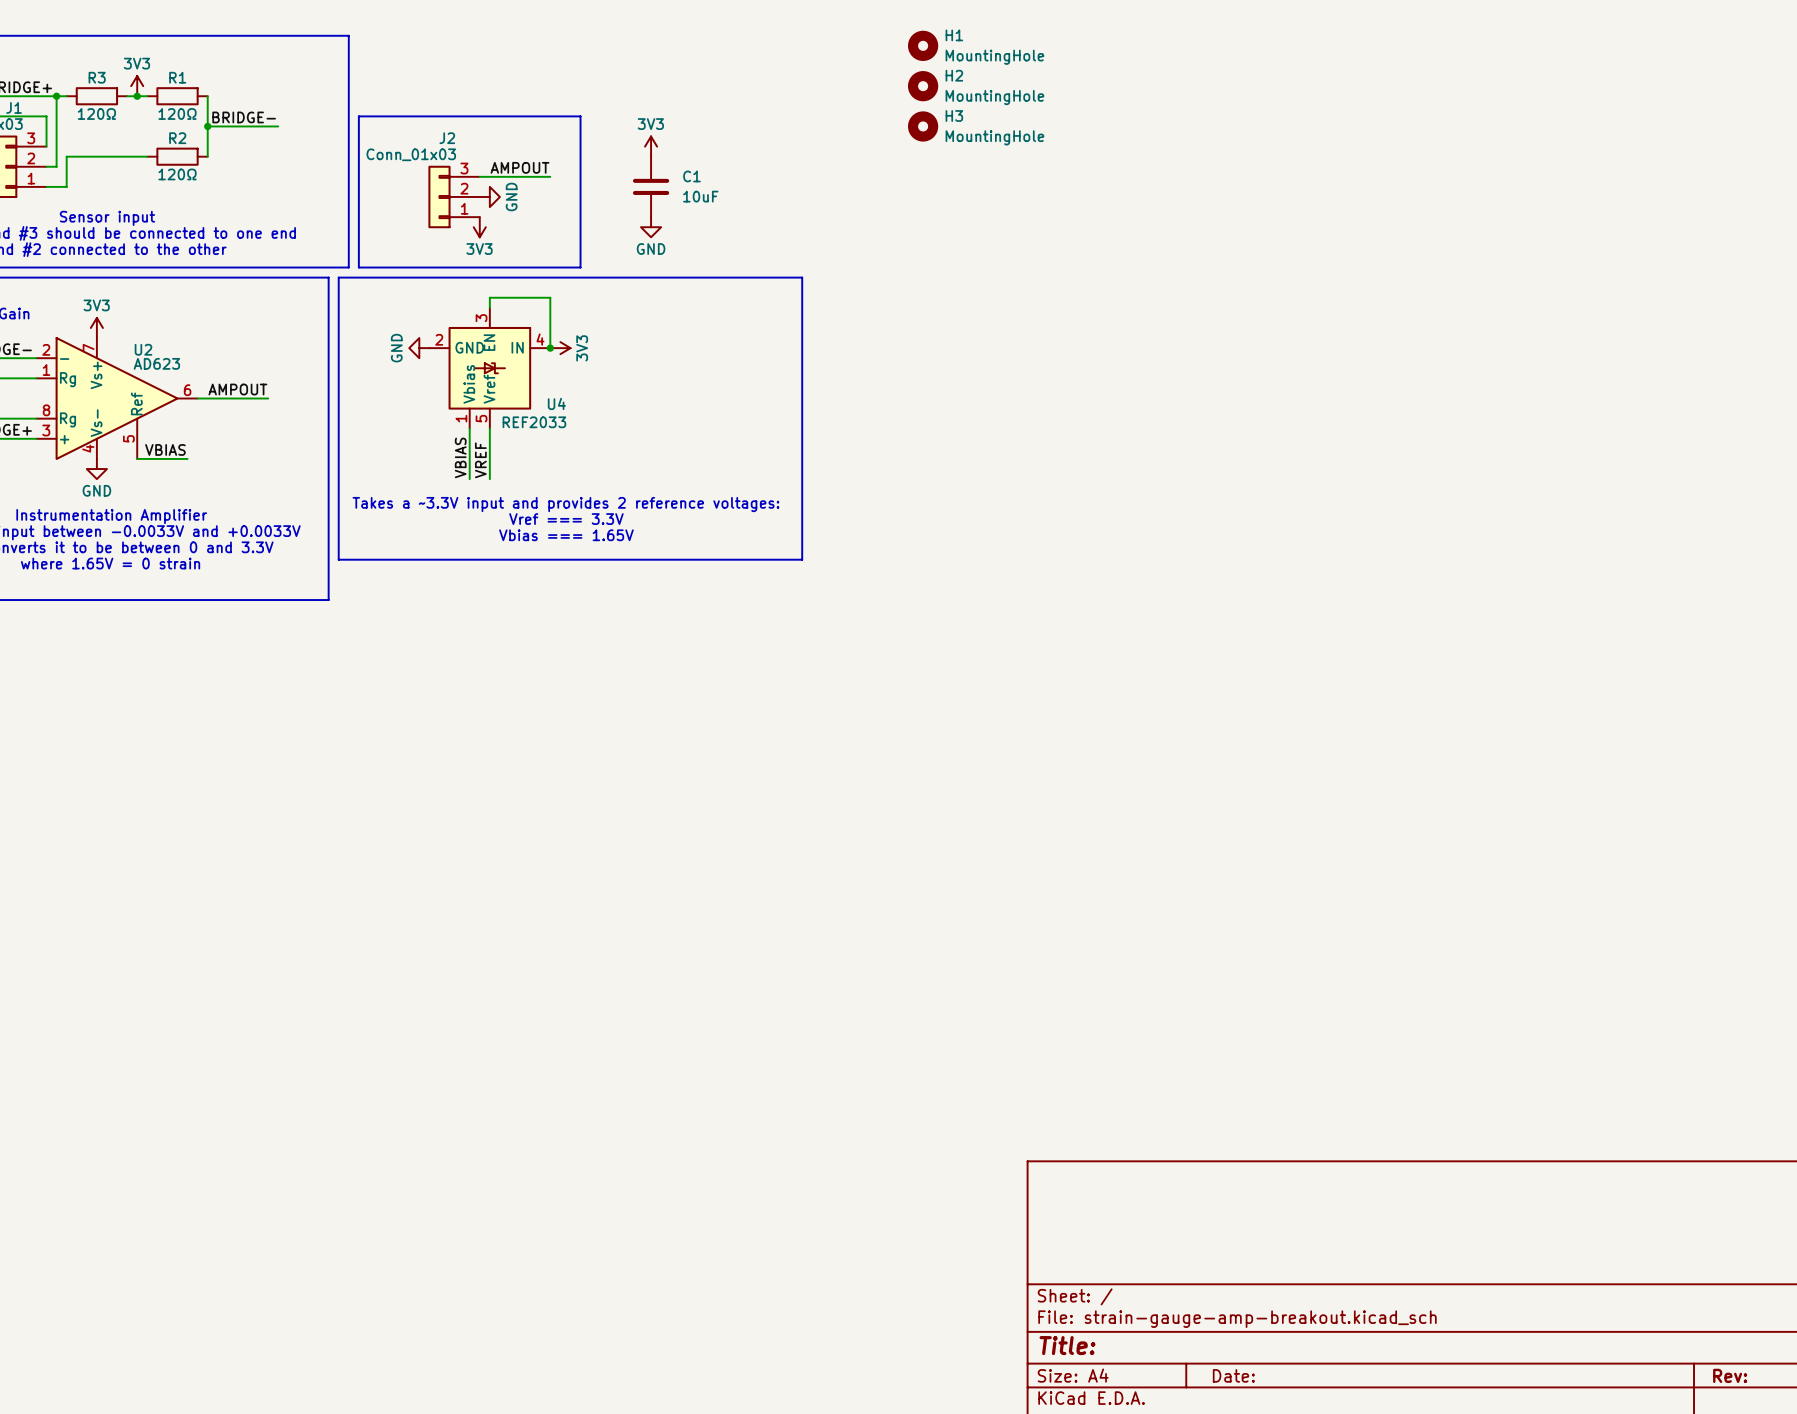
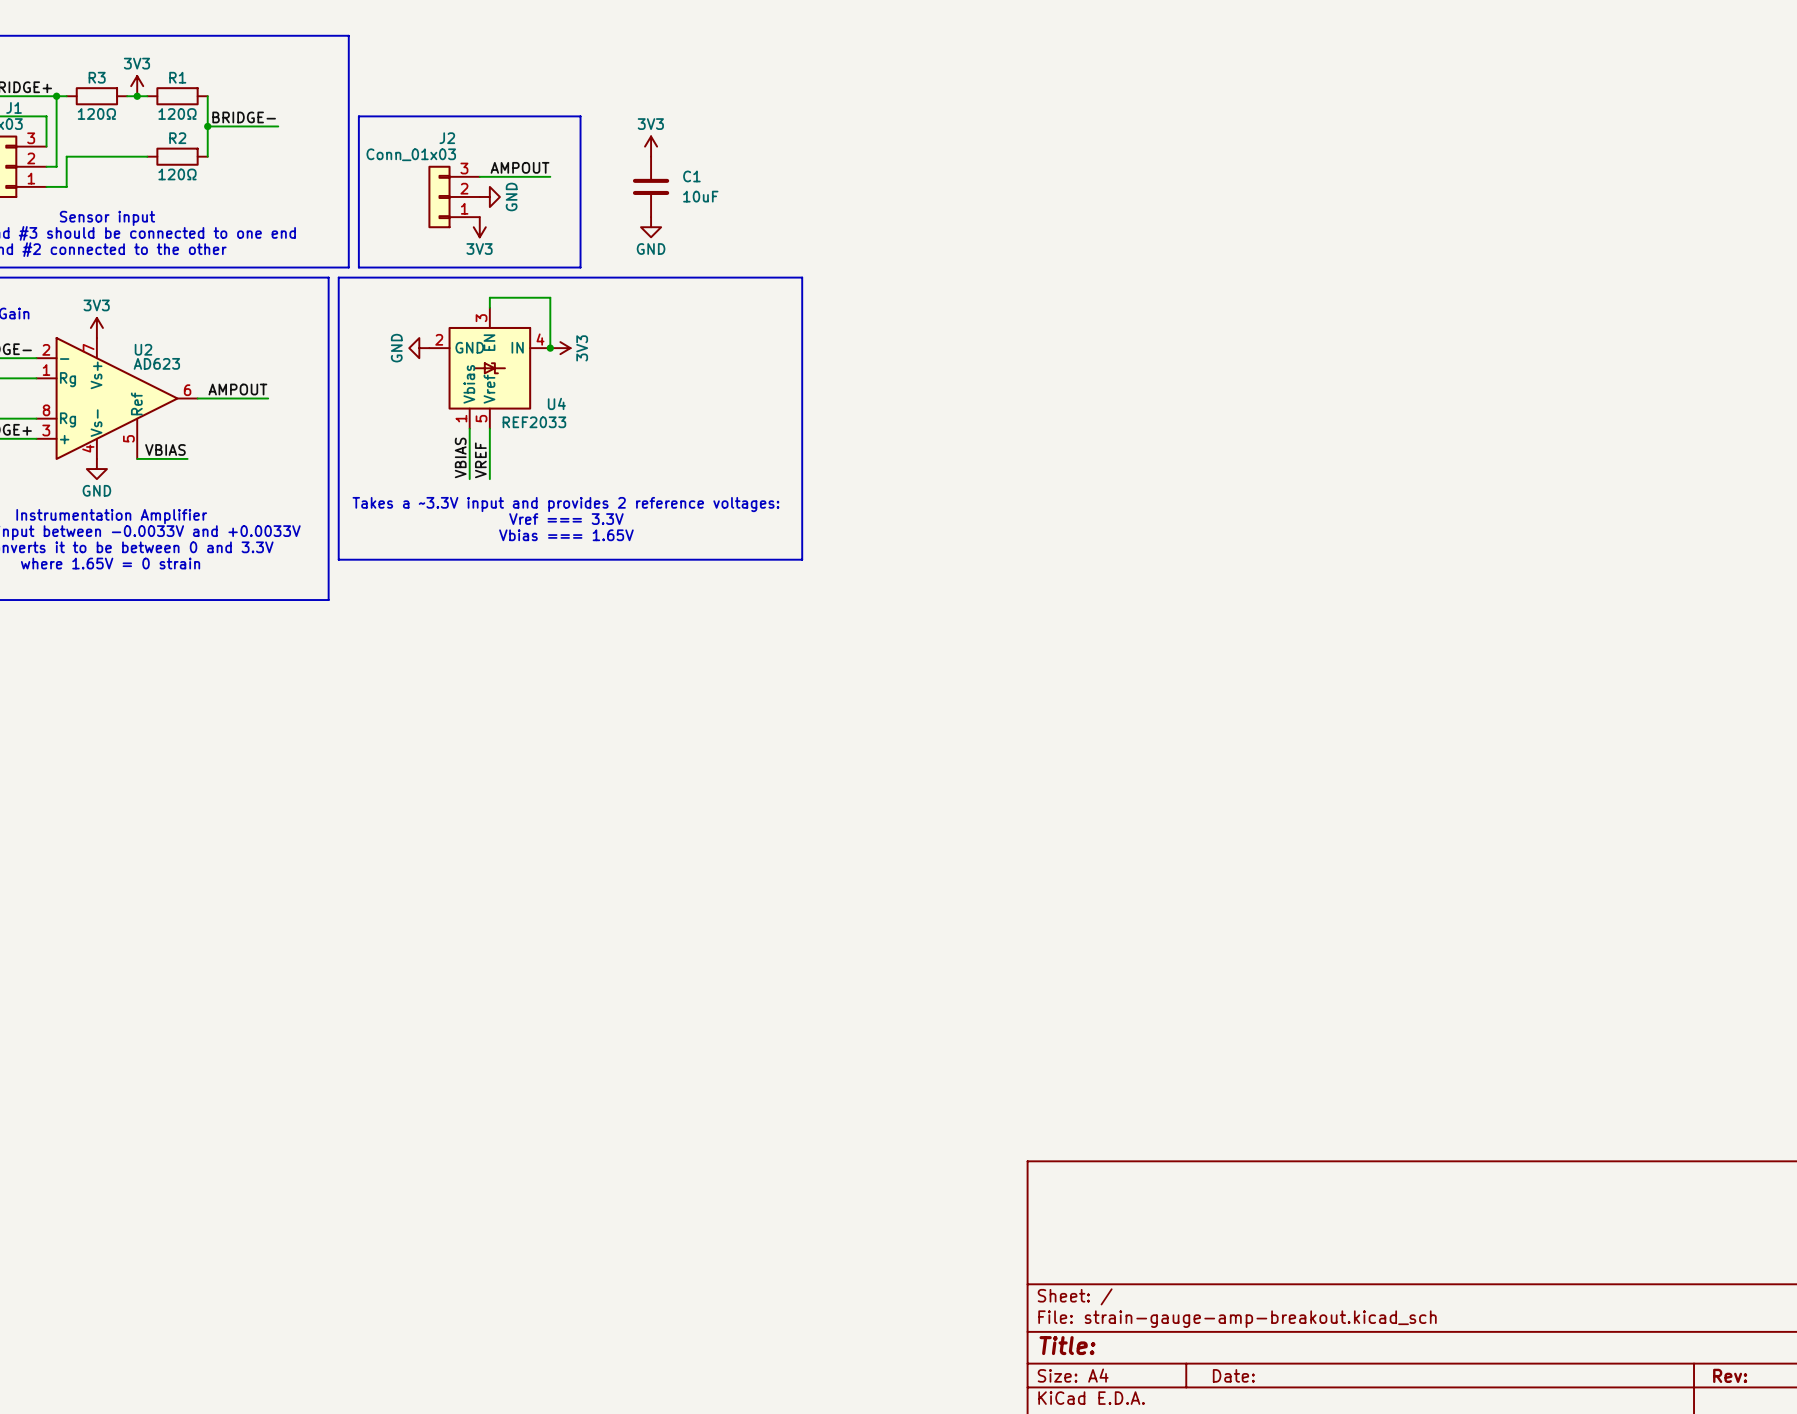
H1: MountingHole (923, 45) -> none
H2: MountingHole (923, 86) -> none
H3: MountingHole (923, 126) -> none

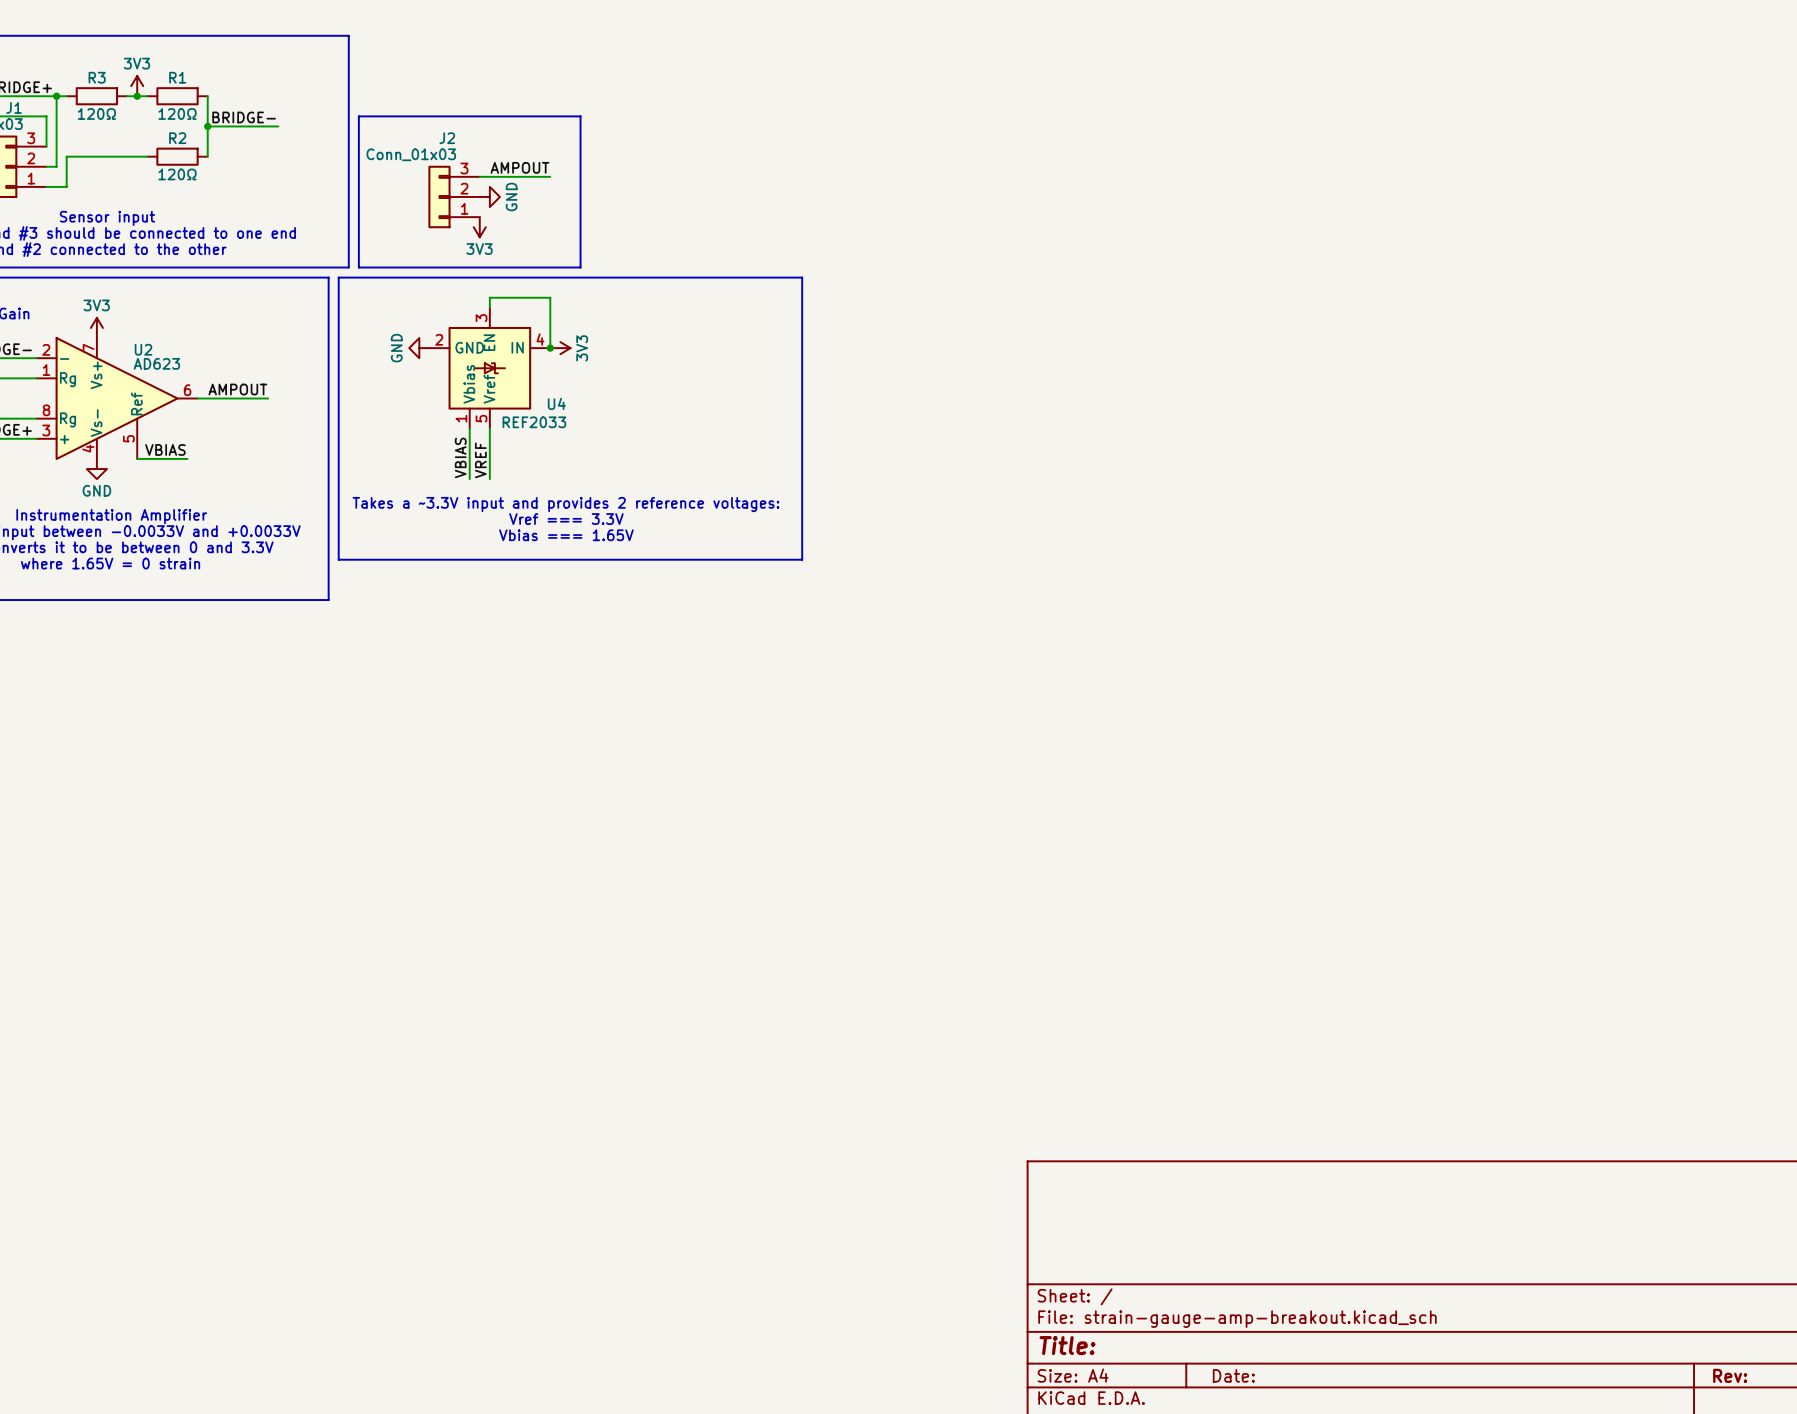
power symbol: 3V3 (651, 146) -> none
C1: 10uF (651, 186) -> none
power symbol: GND (651, 227) -> none

